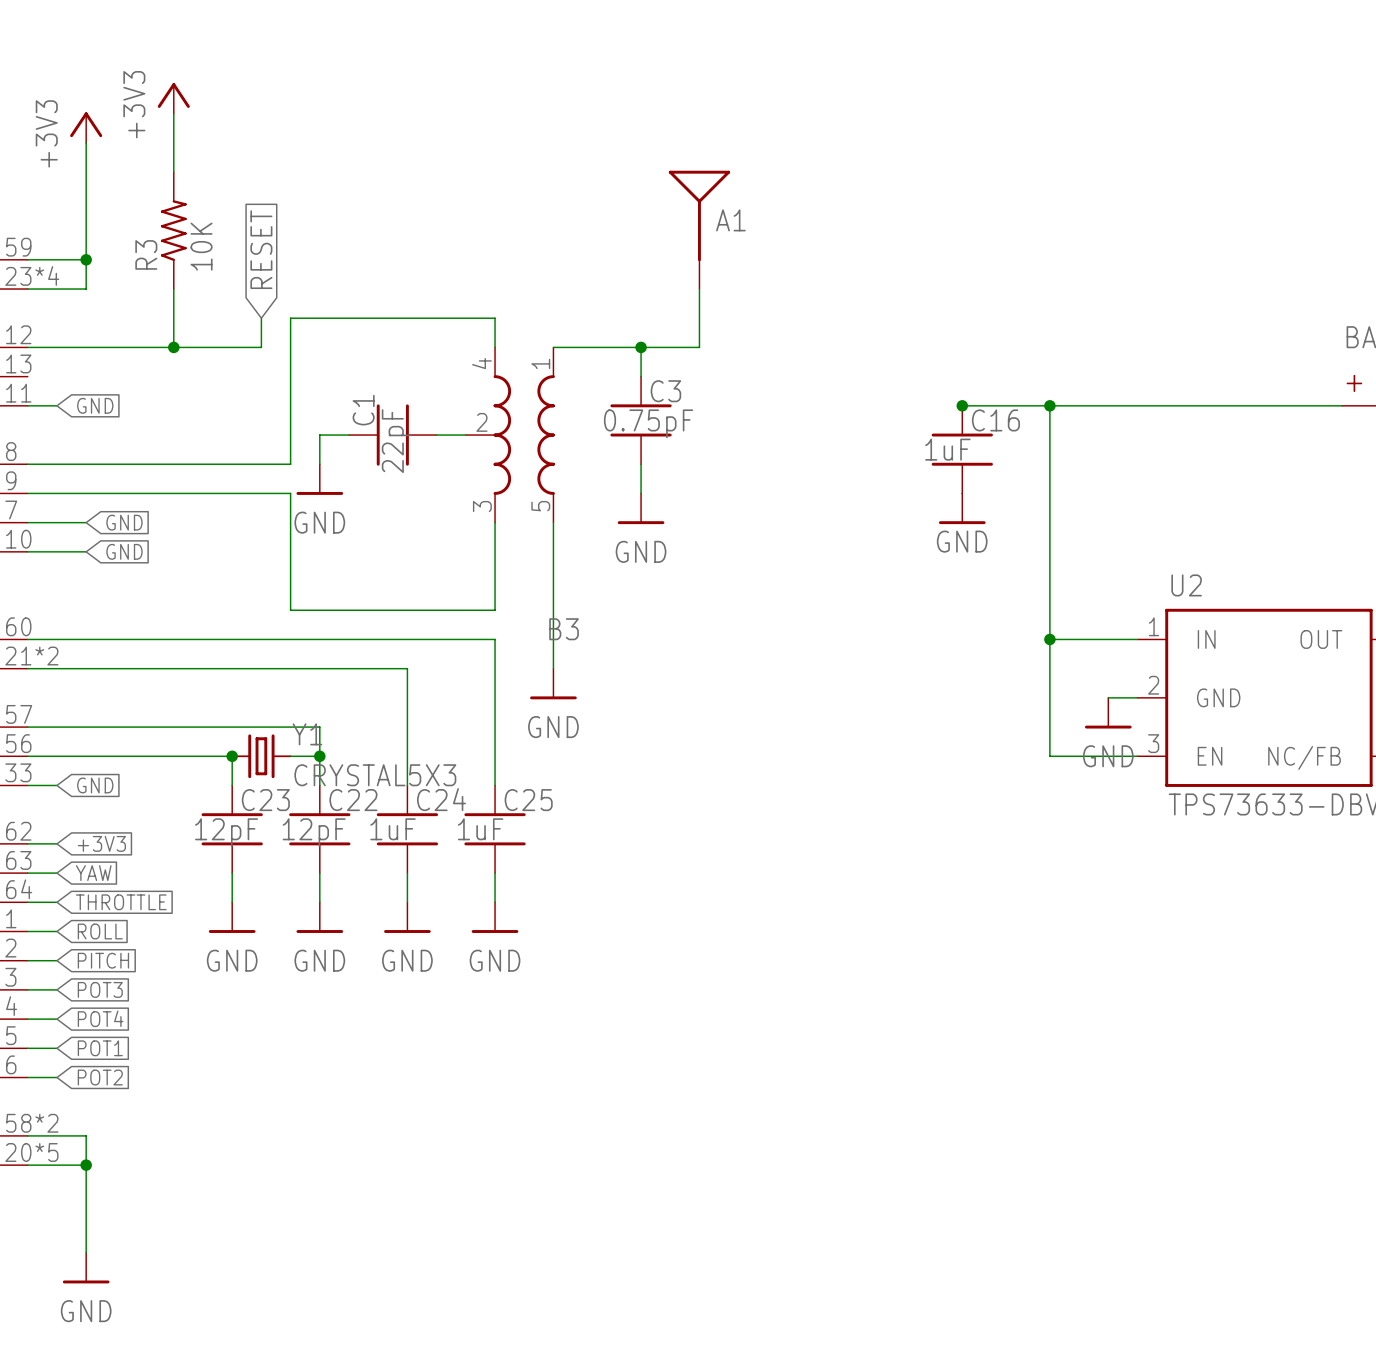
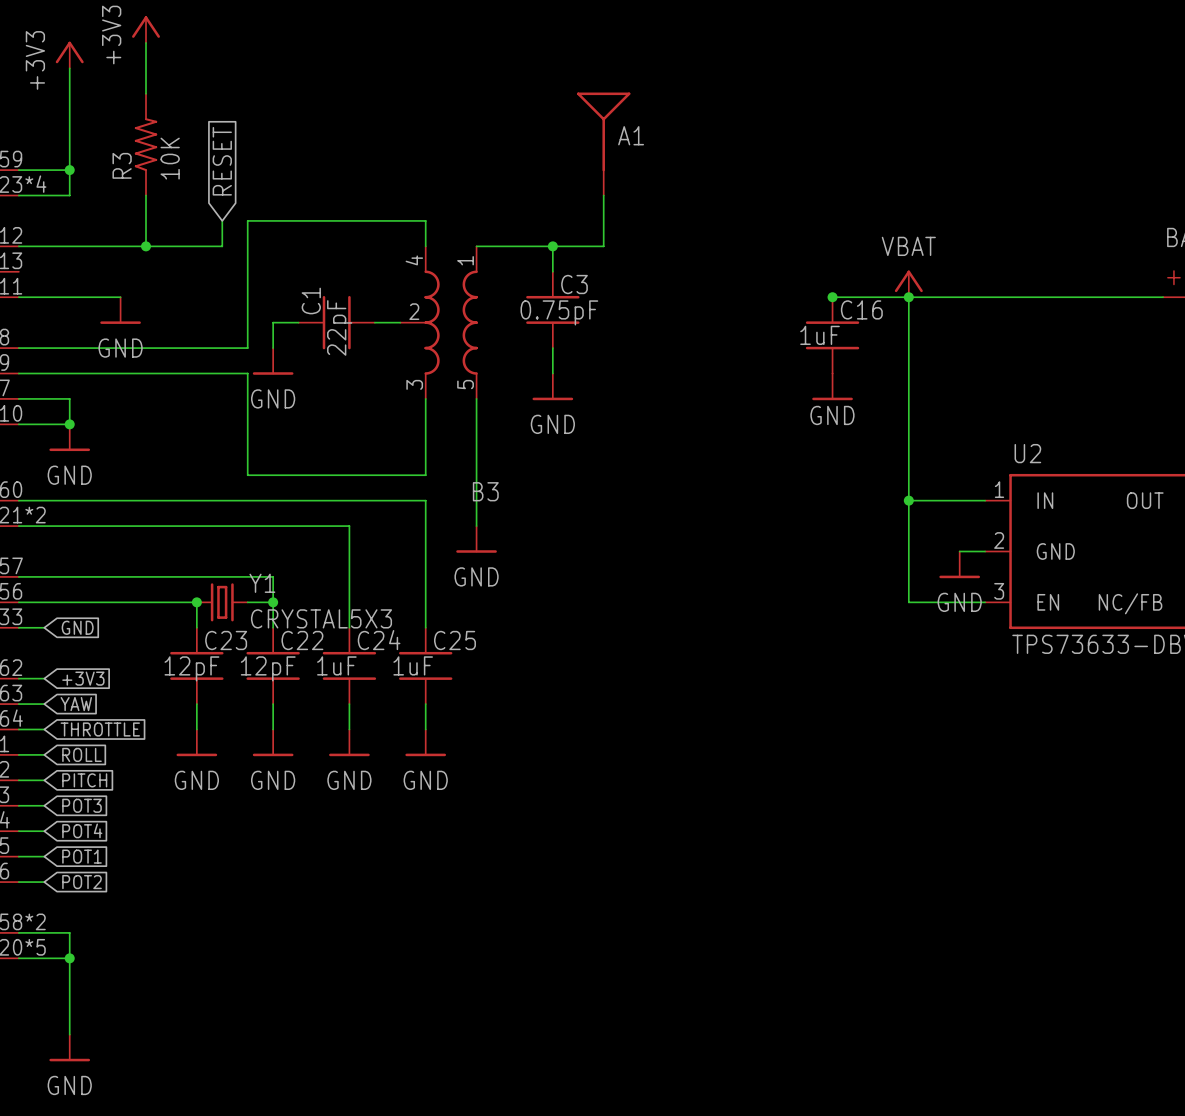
power symbol: none -> VBAT (908, 283)
wire: none -> (44, 297) (120, 297)
global label: GND (95, 405) -> none
power symbol: none -> GND (120, 310)
wire: none -> (69, 398) (69, 424)
global label: GND (124, 522) -> none
junction: none -> (69, 424)
global label: GND (124, 551) -> none
power symbol: none -> GND (69, 437)

